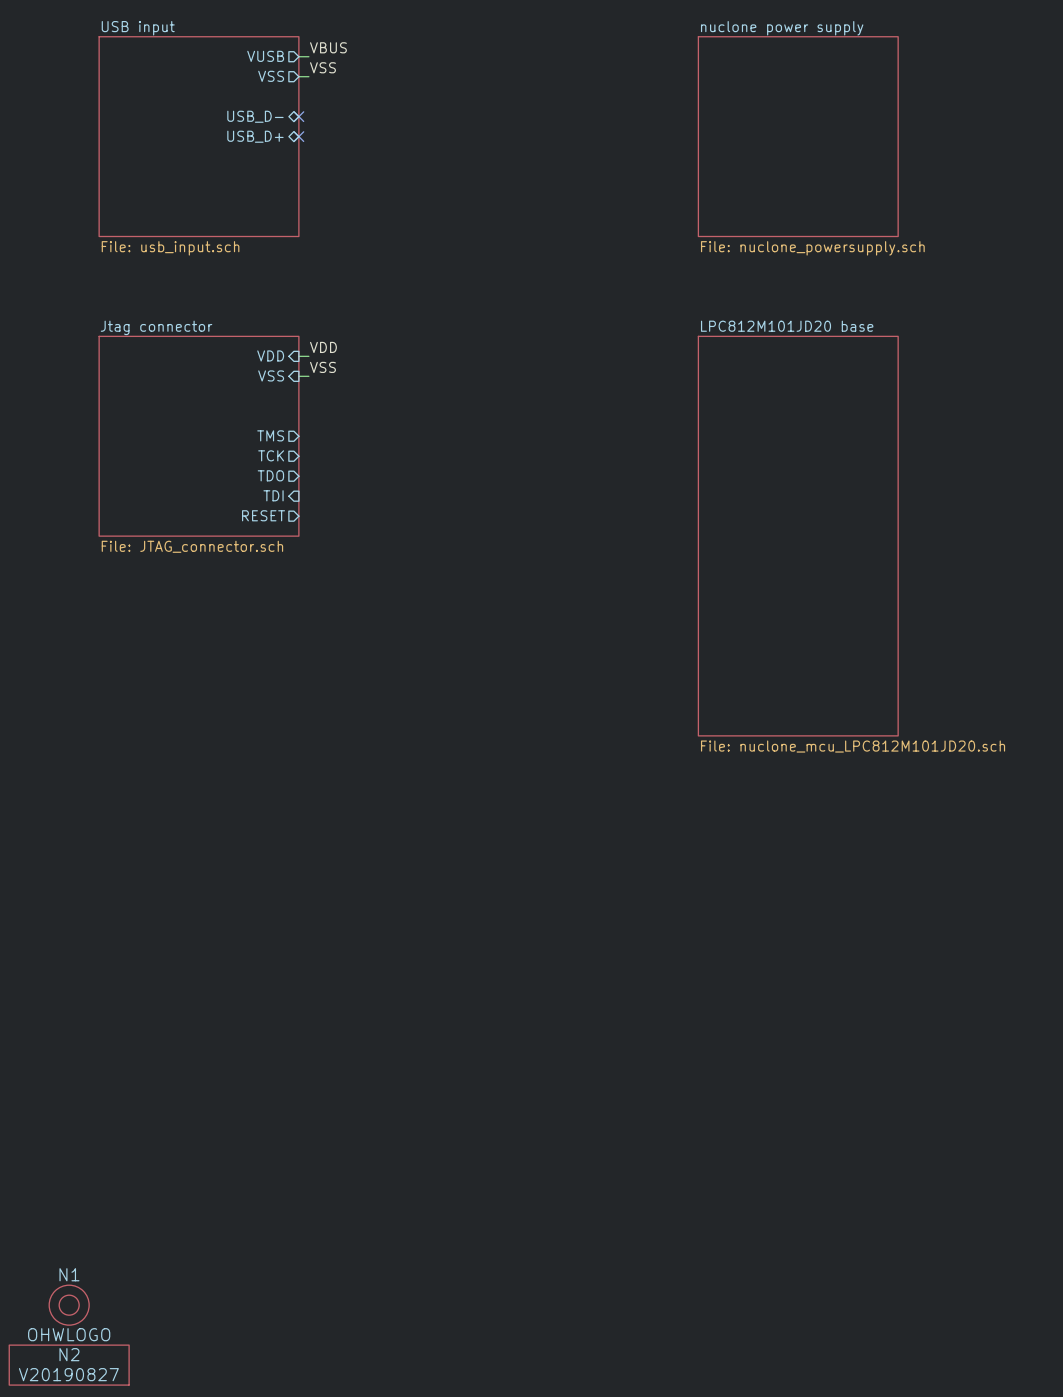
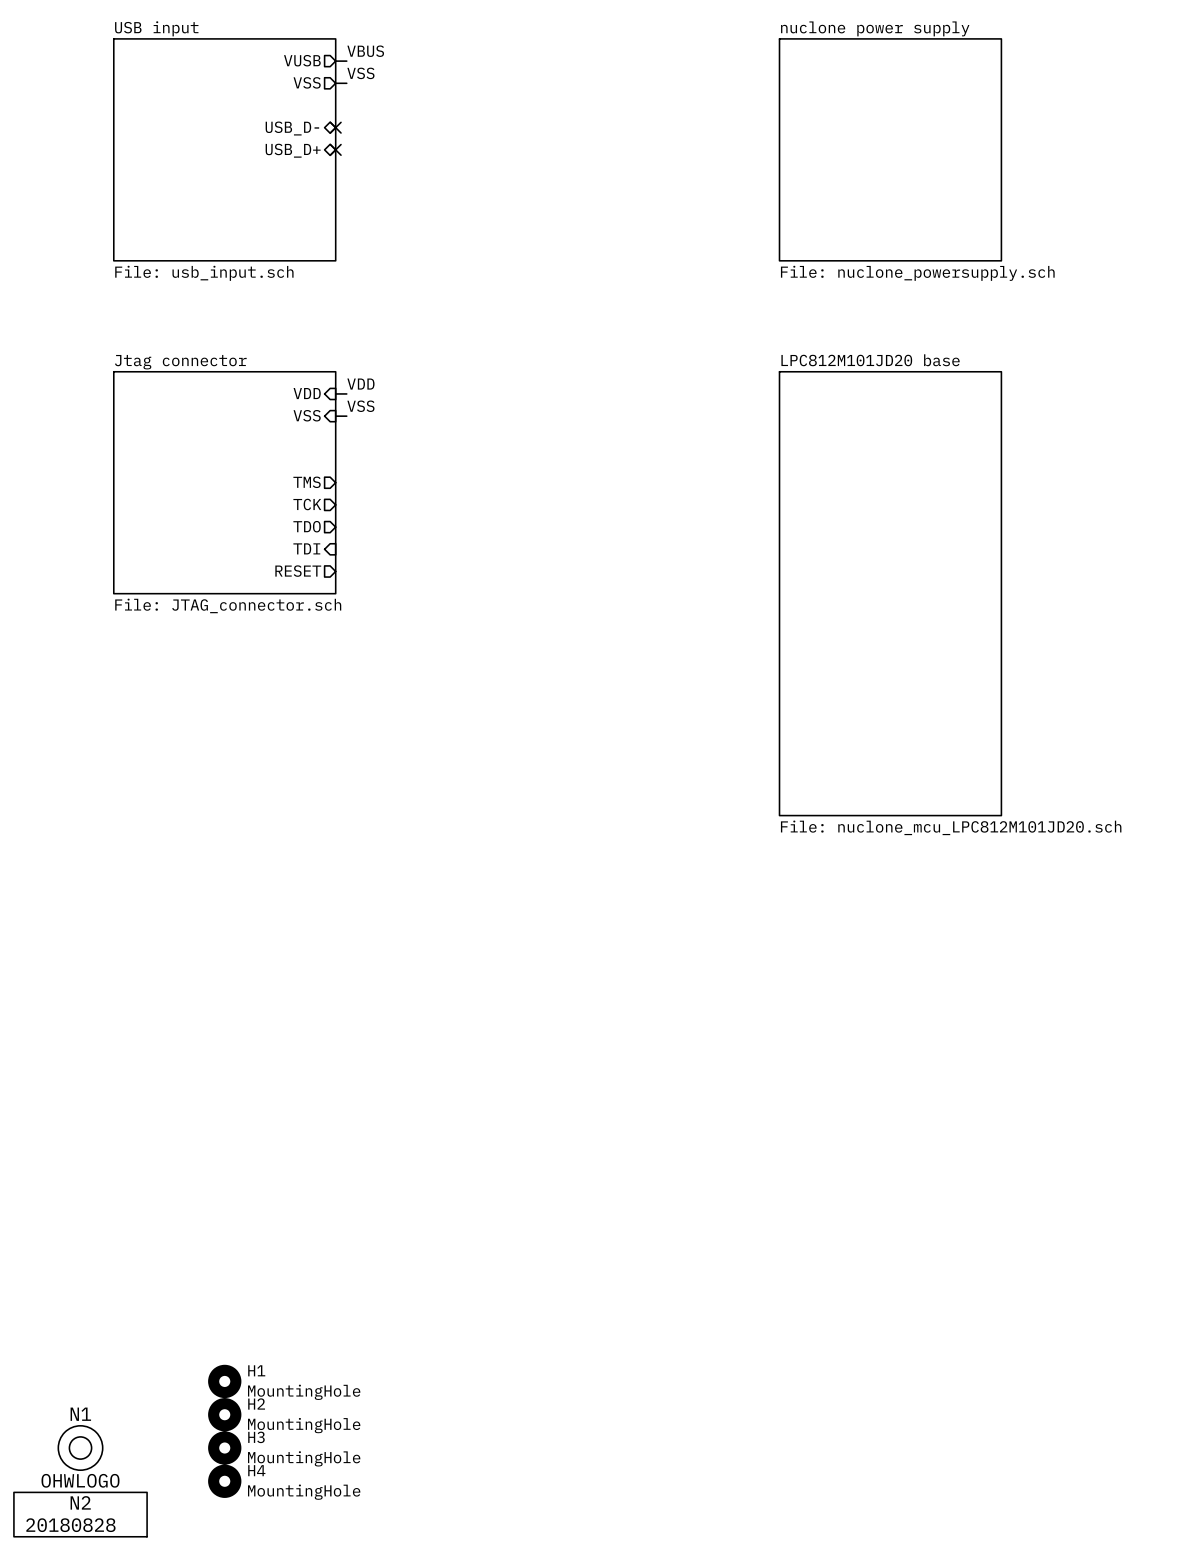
H1: none -> MountingHole (224, 1381)
H2: none -> MountingHole (224, 1414)
H3: none -> MountingHole (224, 1448)
H4: none -> MountingHole (224, 1481)
N2 value: V20190827 (68, 1374) -> 20180828 (70, 1525)

